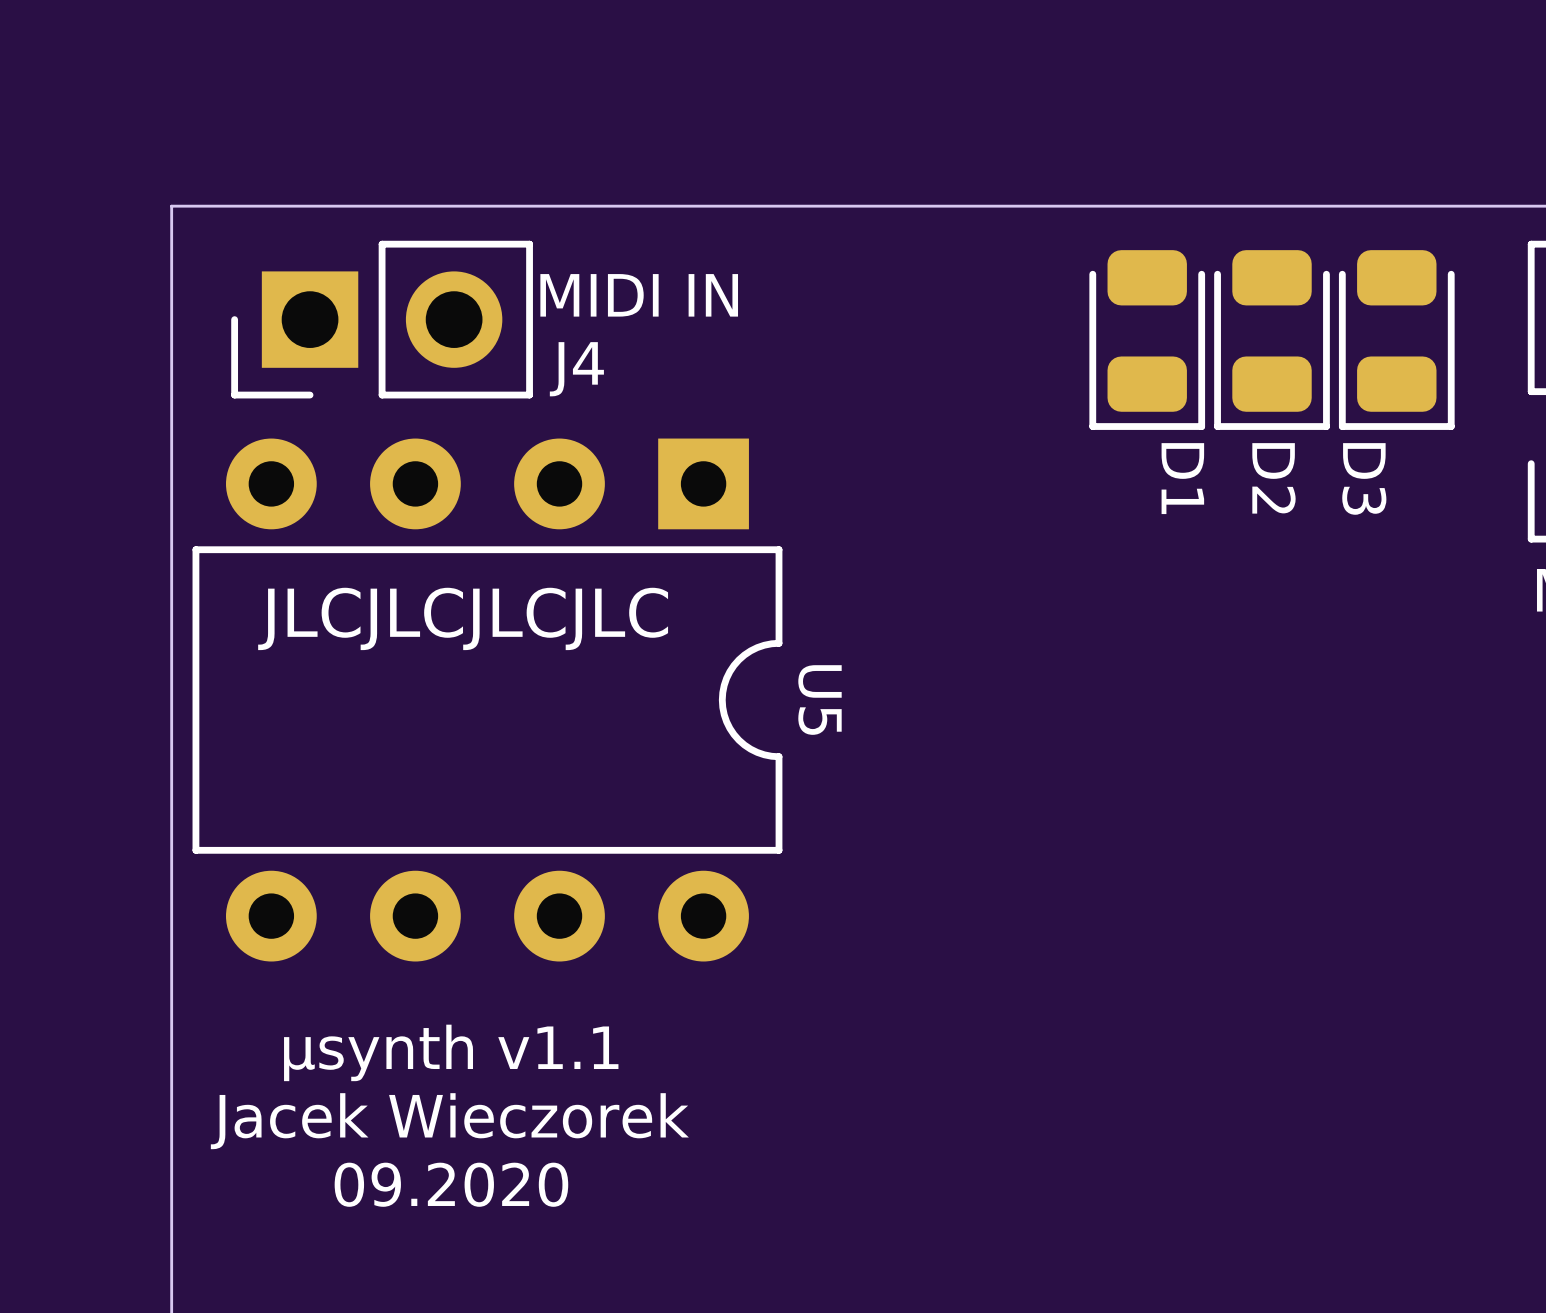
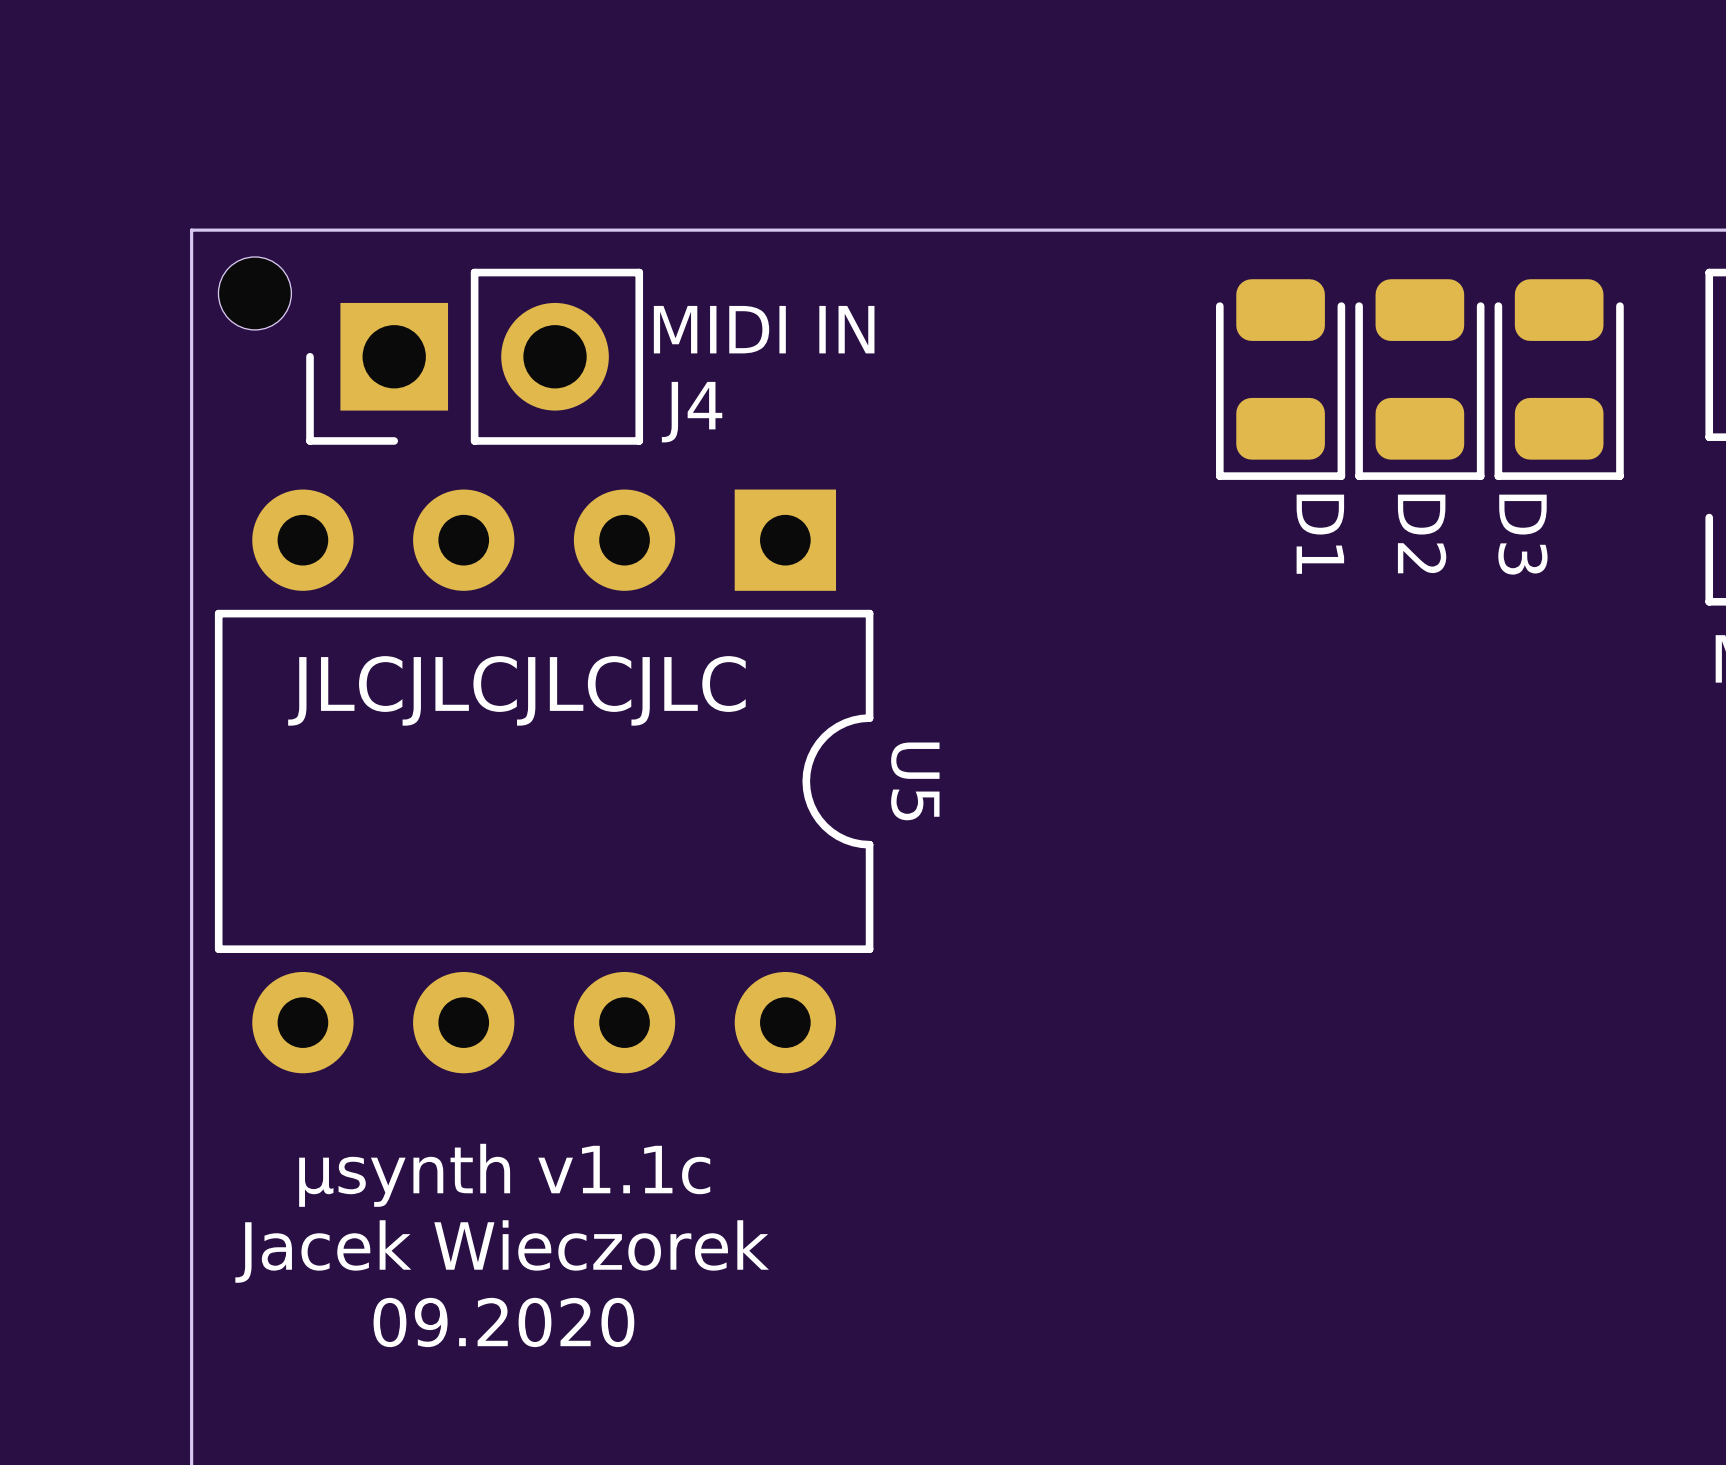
part: none -> (254, 293)
text position: MIDI IN (639, 295) -> MIDI IN (764, 329)
J4 position: (382, 319) -> (474, 356)
text: µsynth v1.1 (451, 1052) -> µsynth v1.1c (504, 1175)

